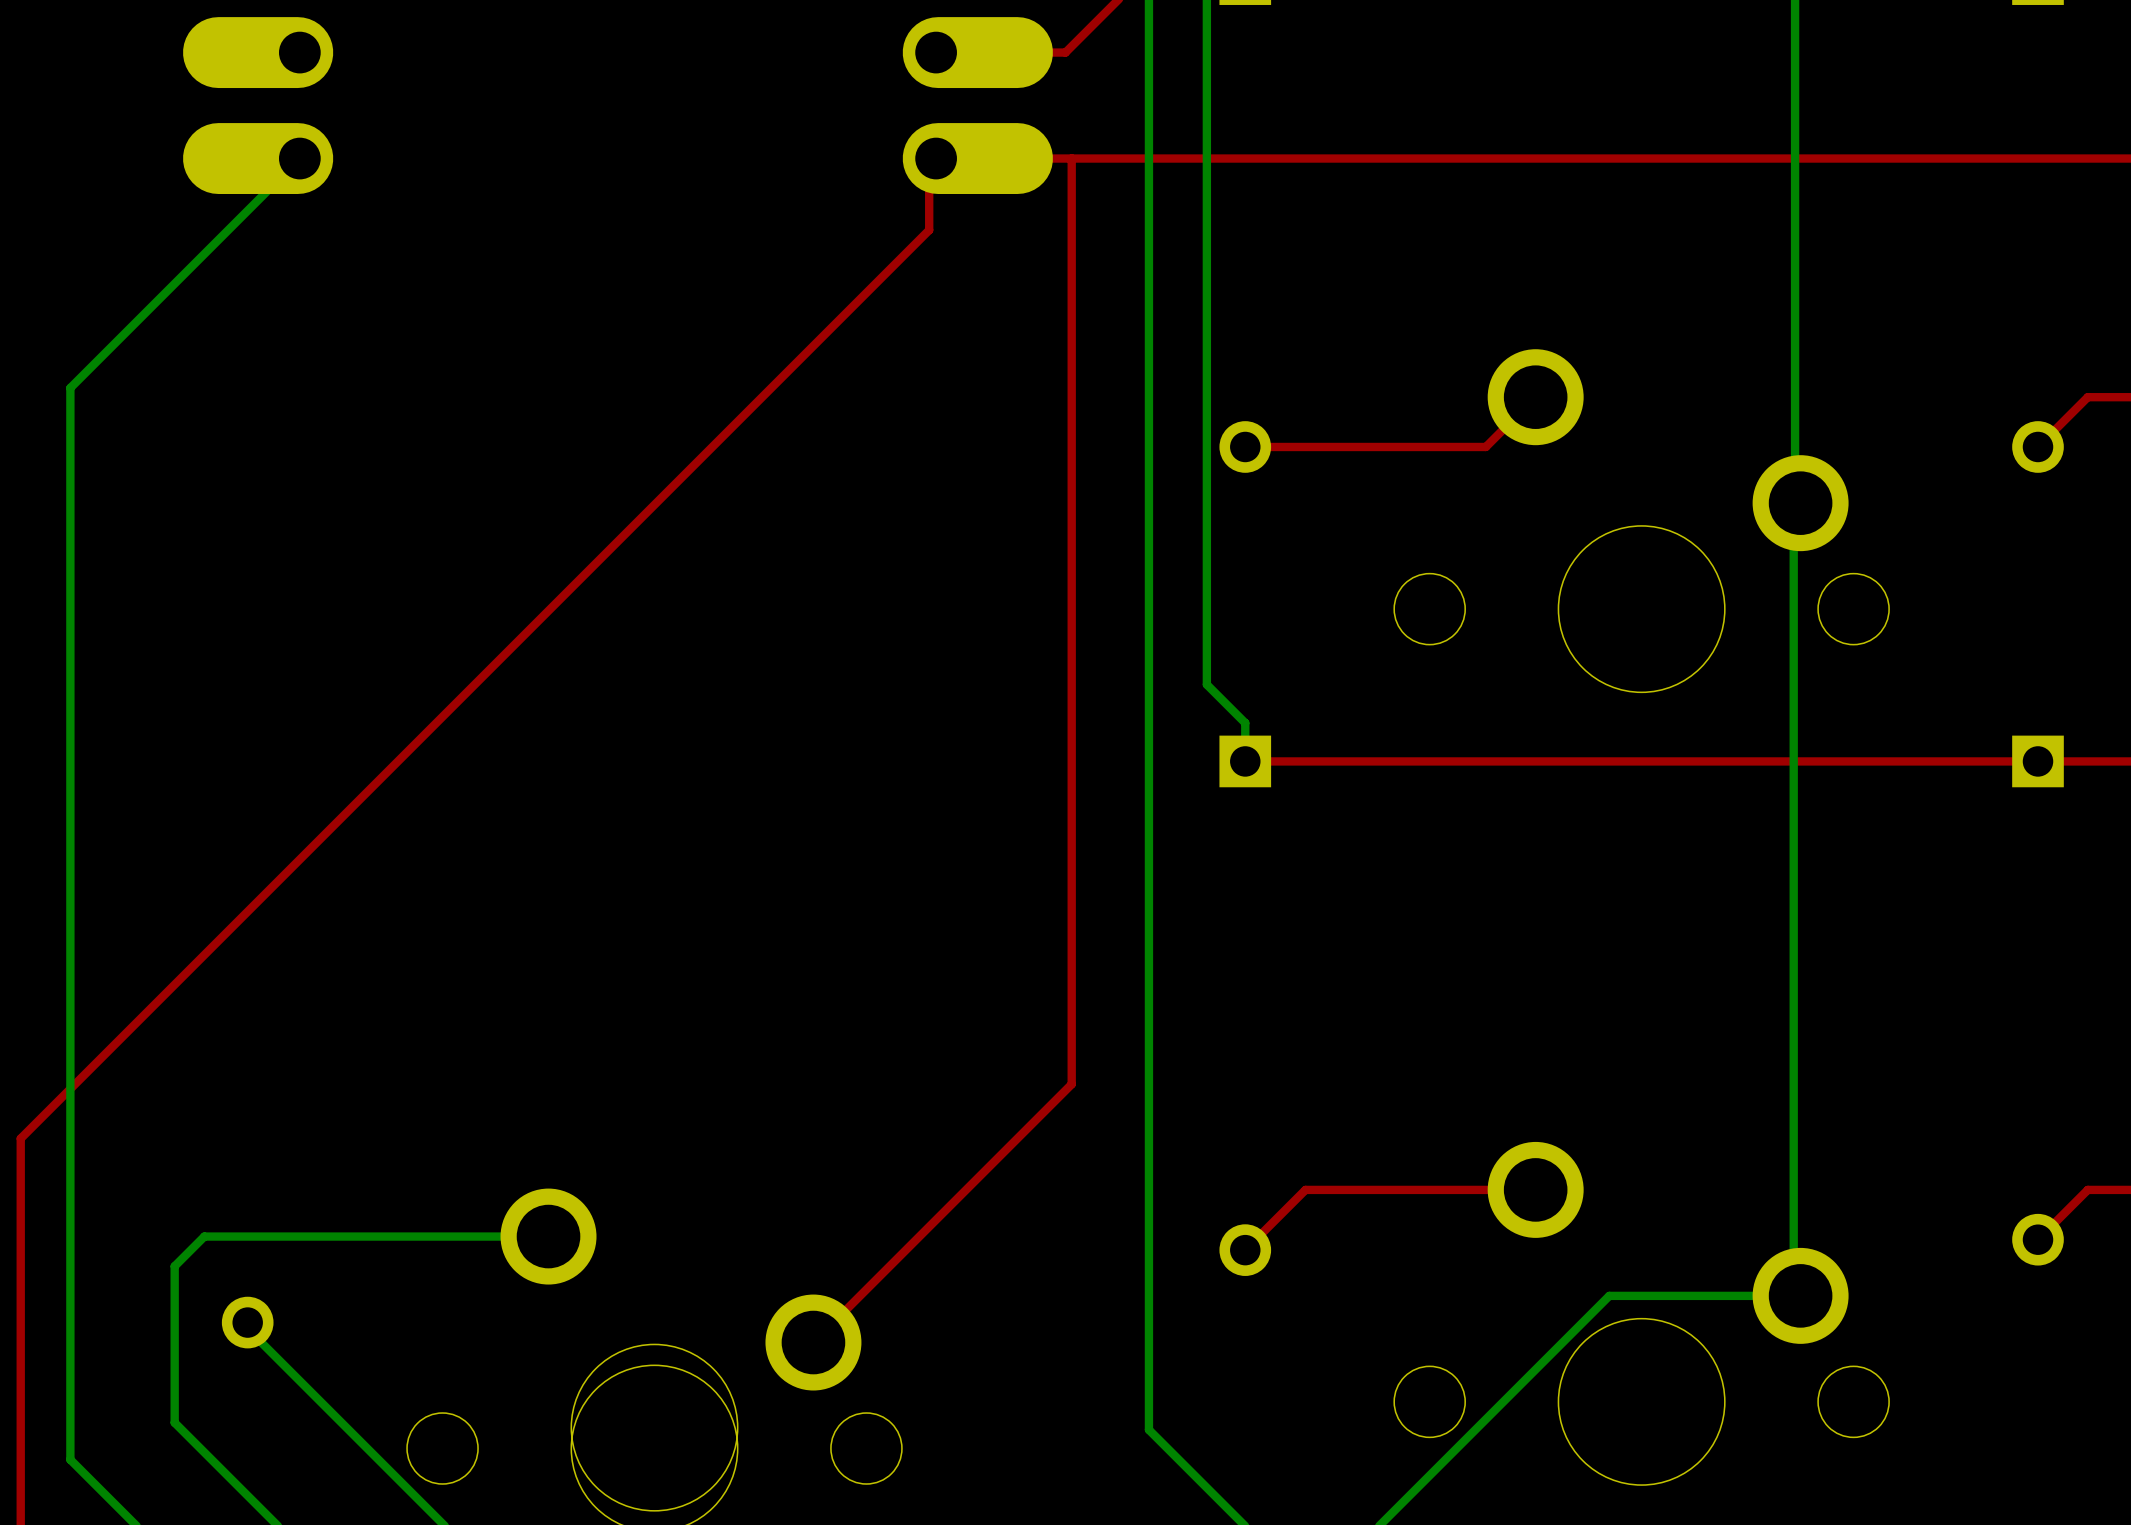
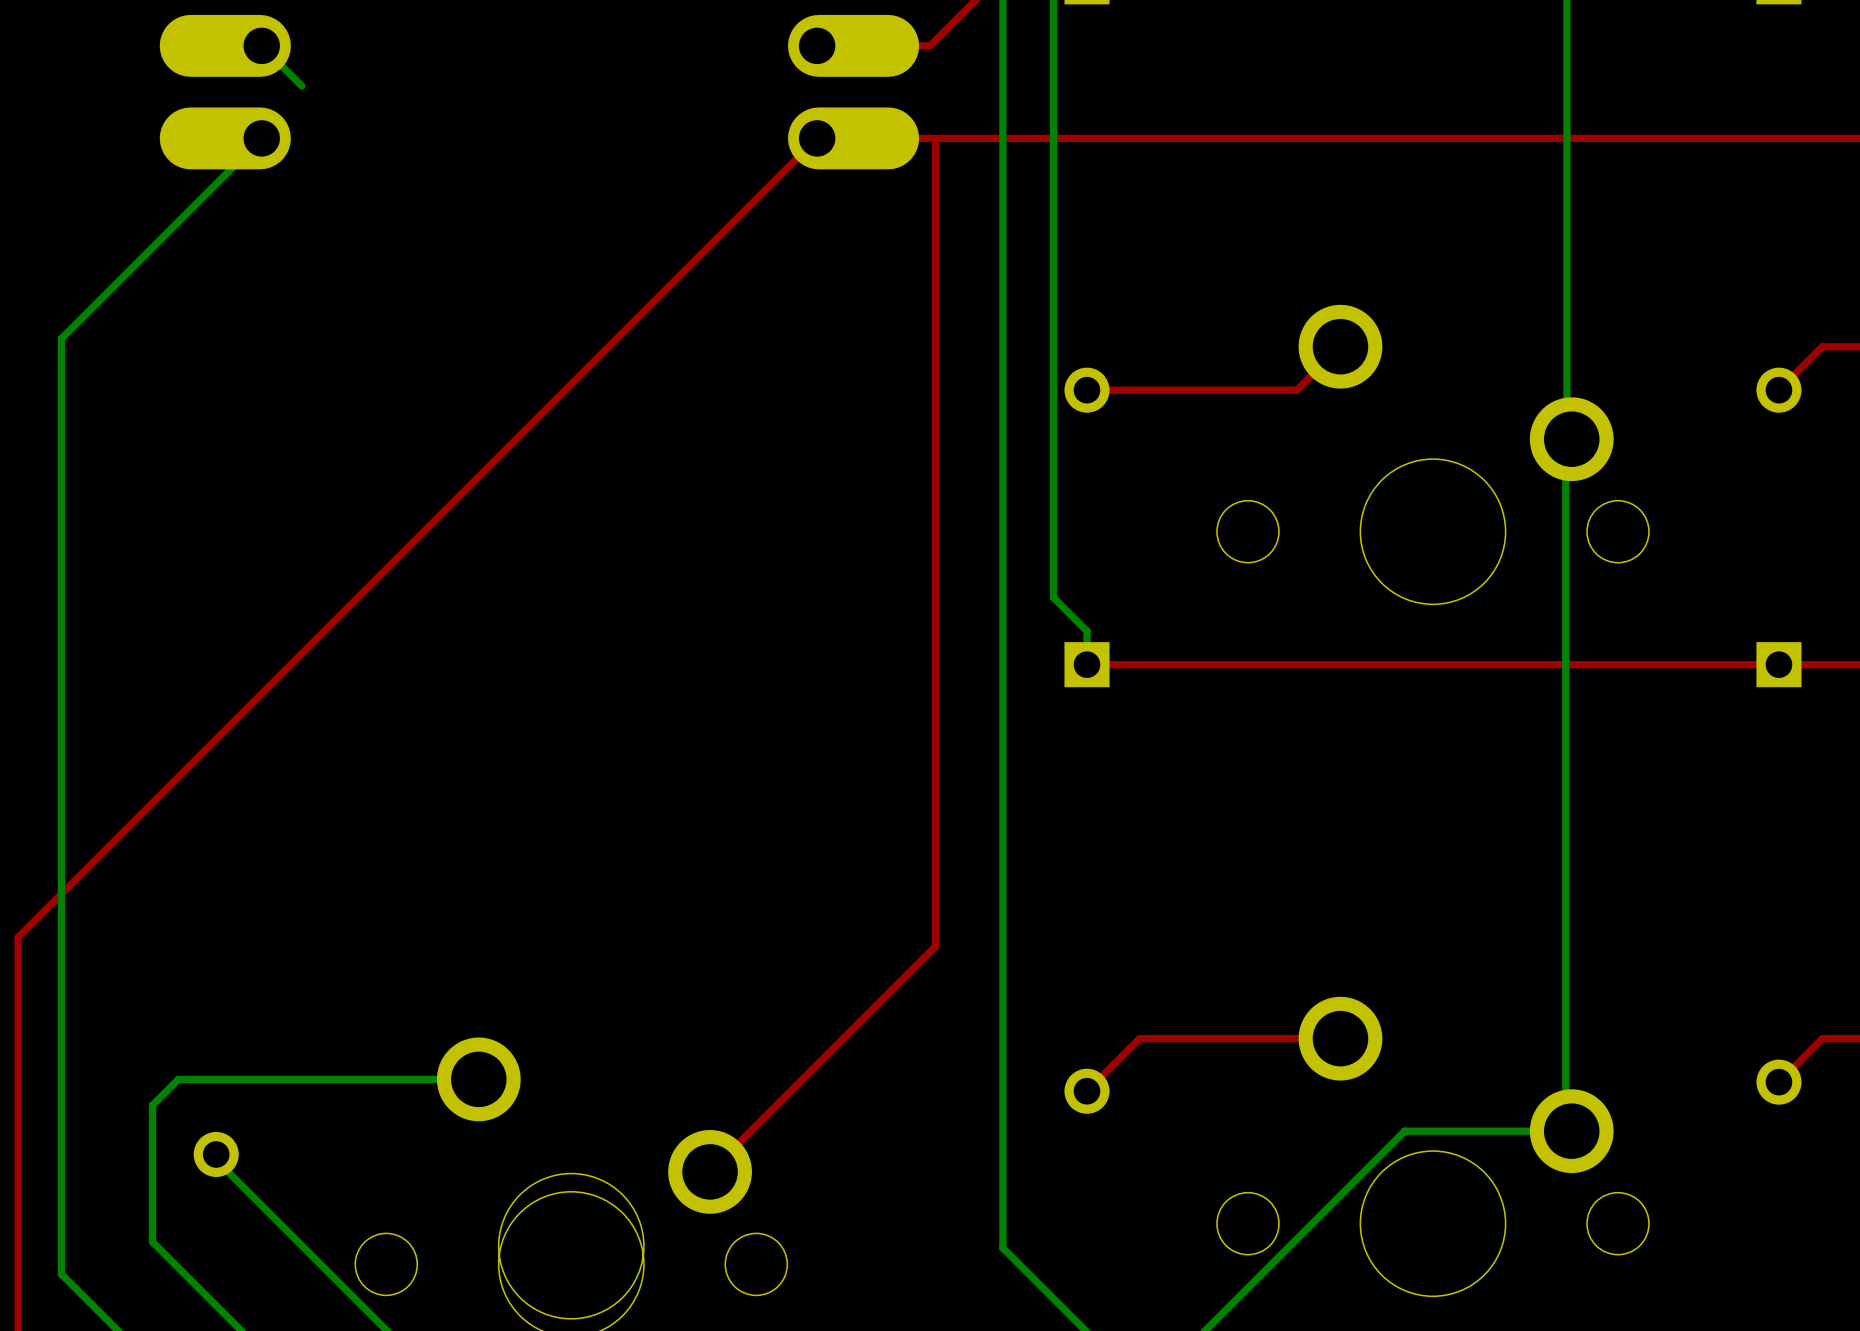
bottom track: none -> (261, 45) (301, 85)
top track: (924, 170) (929, 175) (929, 230) (20, 1138) -> (806, 148) (18, 937) (18, 993)

